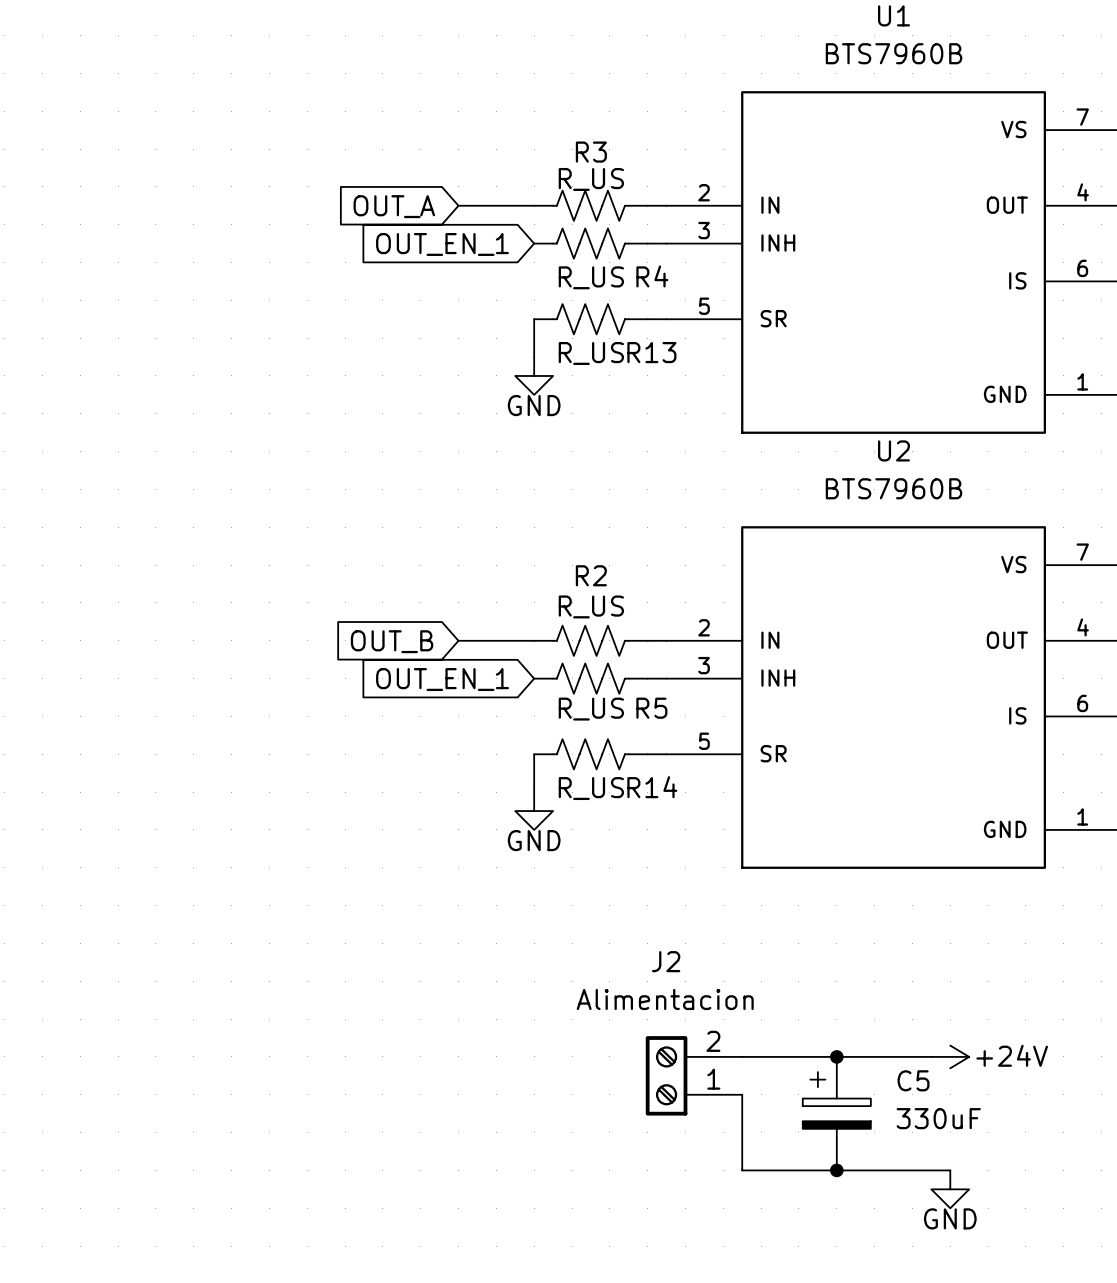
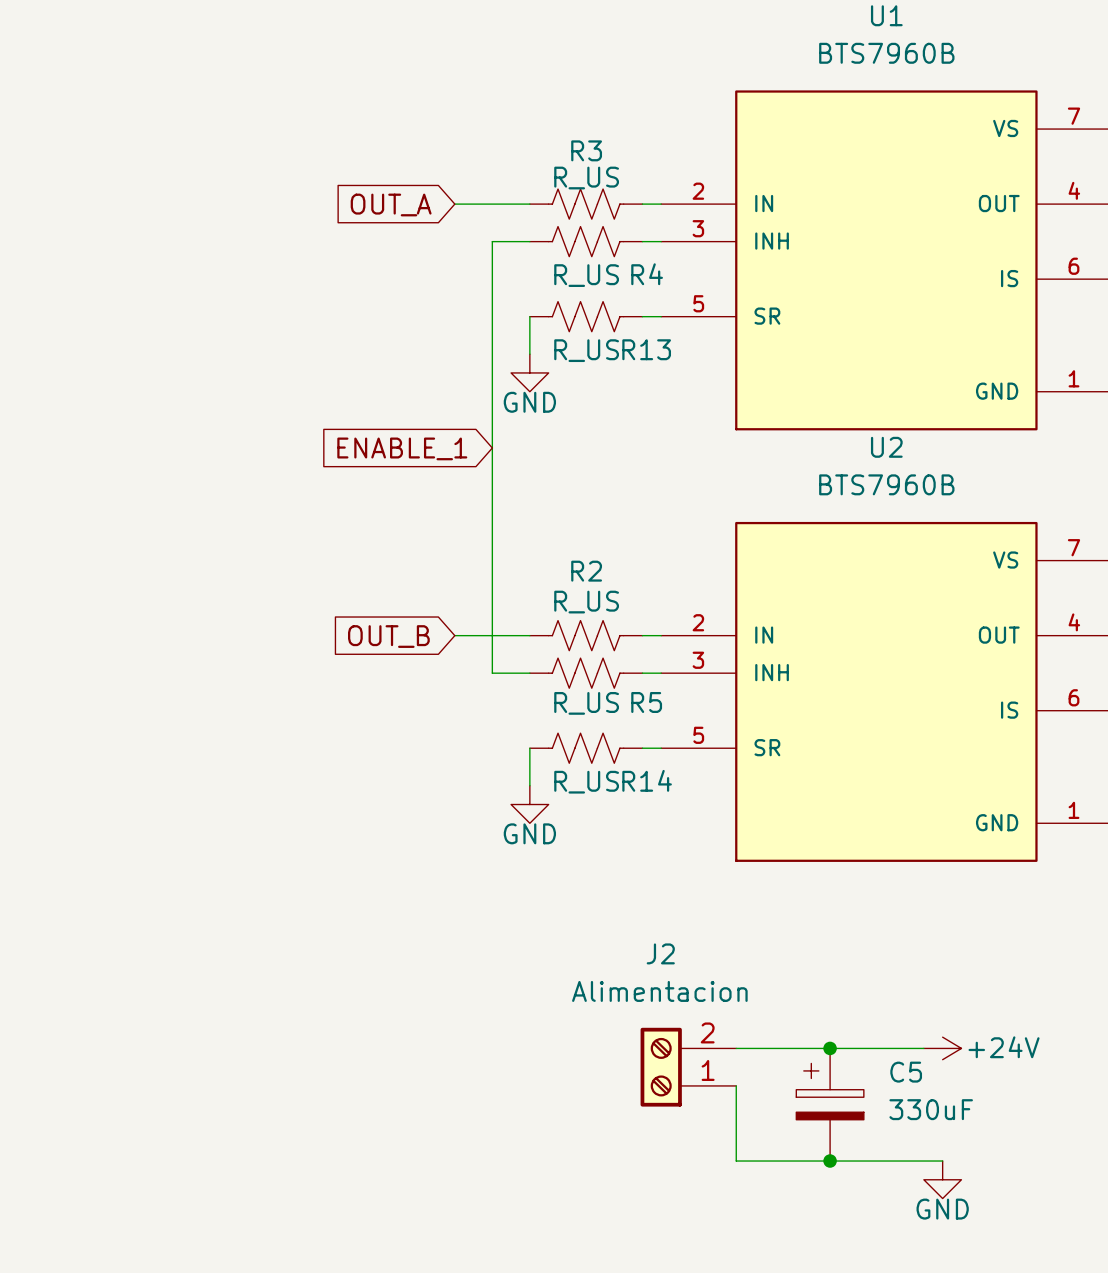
wire: none -> (529, 241) (492, 241) (492, 673) (529, 673)
global label: OUT_EN_1 (442, 244) -> none
global label: none -> ENABLE_1 (402, 448)
global label: OUT_EN_1 (442, 679) -> none

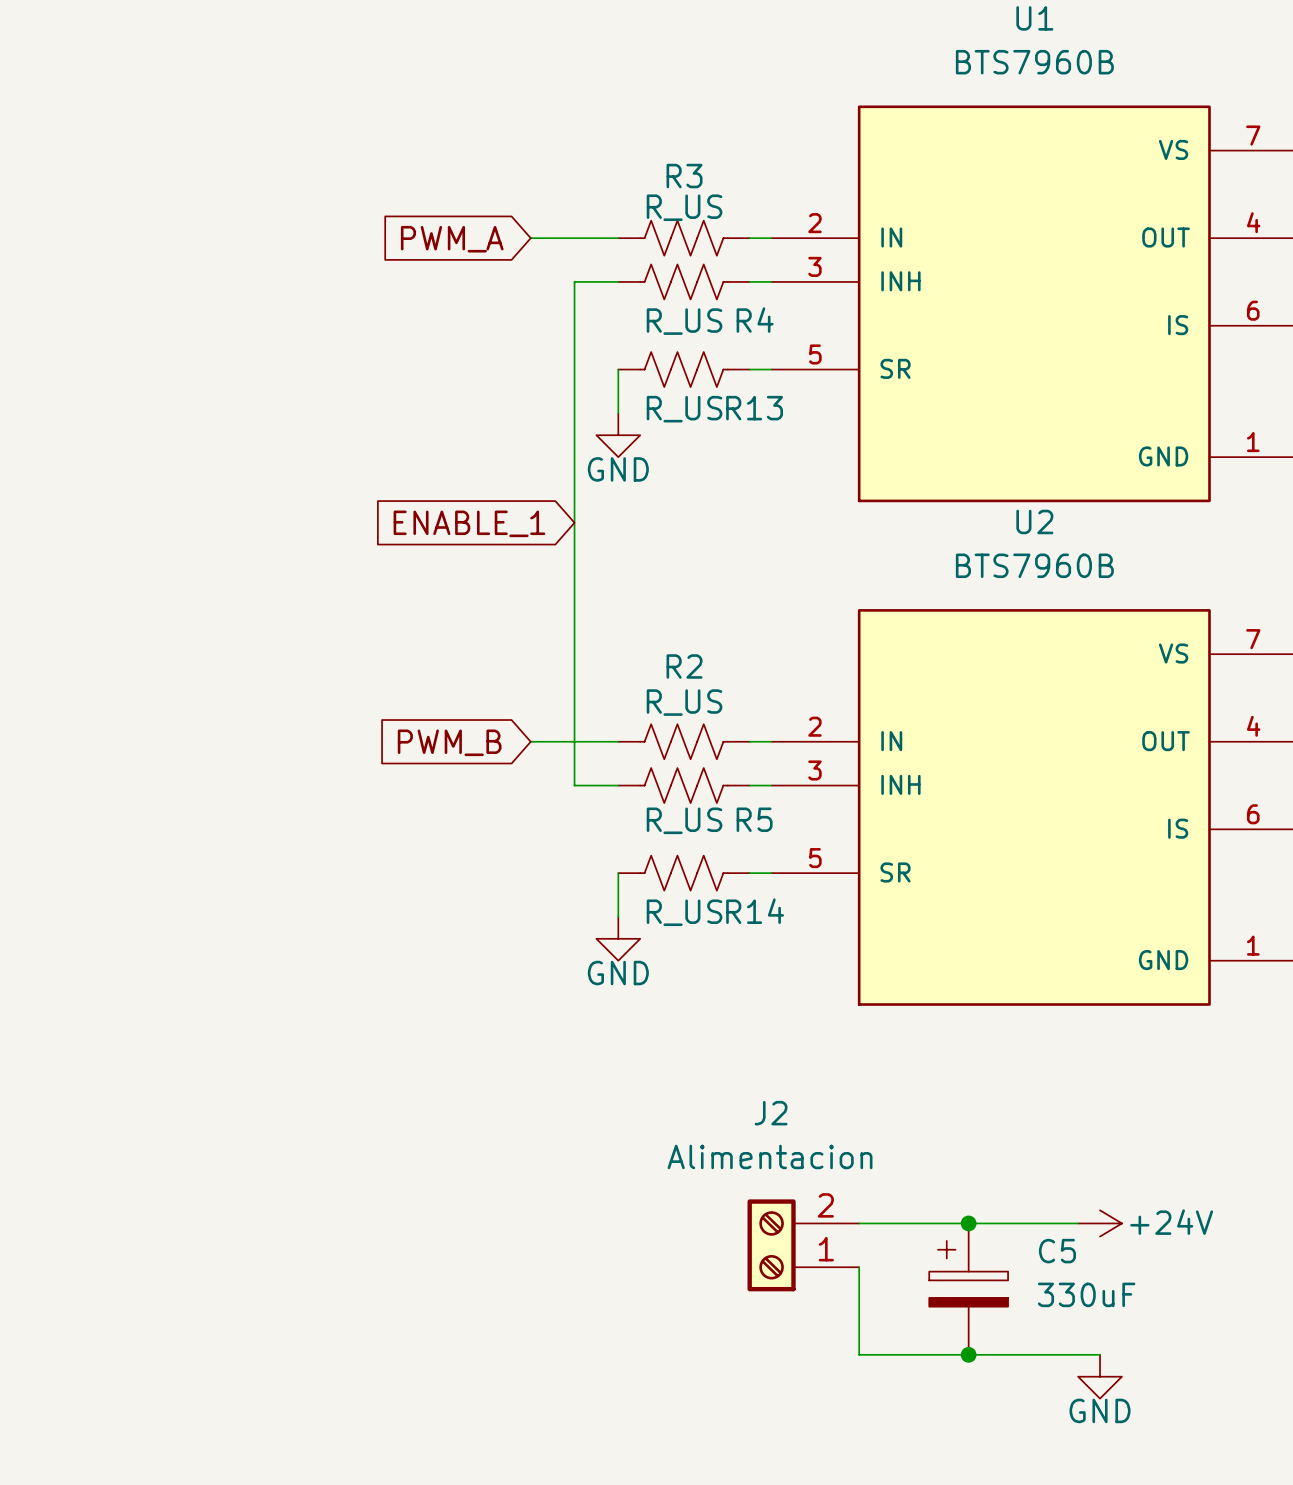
global label: OUT_A (391, 204) -> PWM_A (452, 239)
global label: OUT_B (388, 636) -> PWM_B (449, 742)

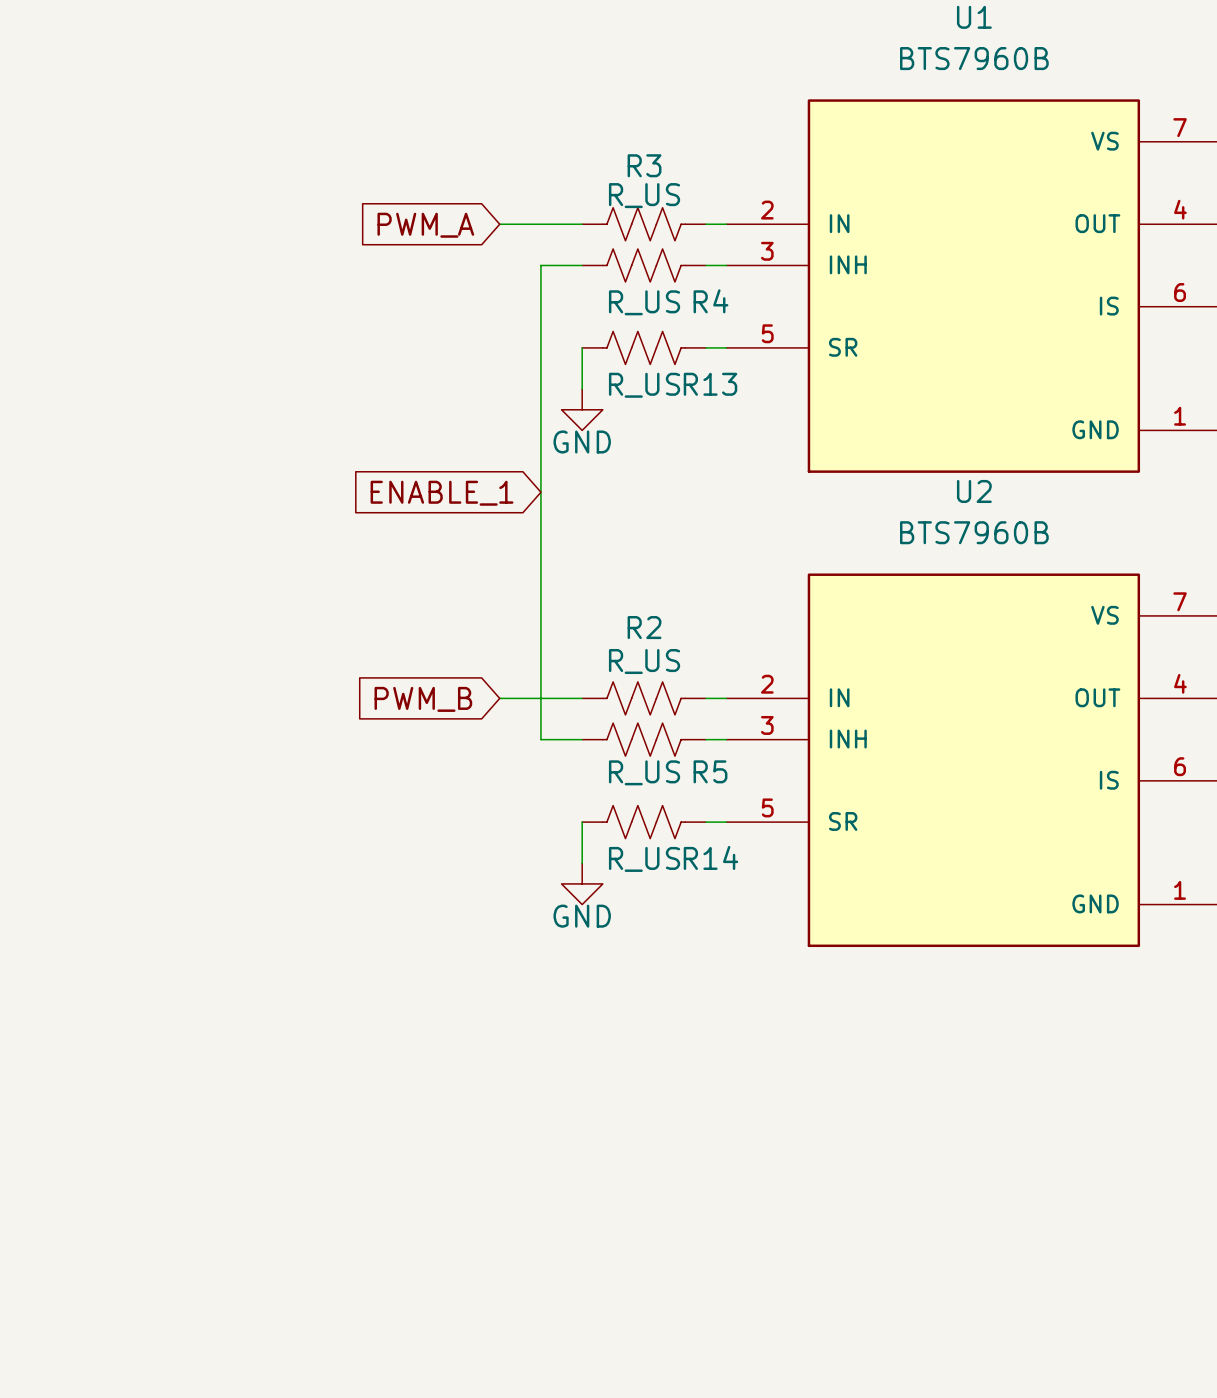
wire: (859, 1223) (1078, 1223) -> none
junction: (968, 1223) -> none
power symbol: +24V (1100, 1223) -> none
J2: Alimentacion (803, 1245) -> none
wire: (859, 1267) (859, 1354) (1100, 1354) -> none
C5: 330uF (968, 1289) -> none
junction: (968, 1354) -> none
power symbol: GND (1100, 1376) -> none

